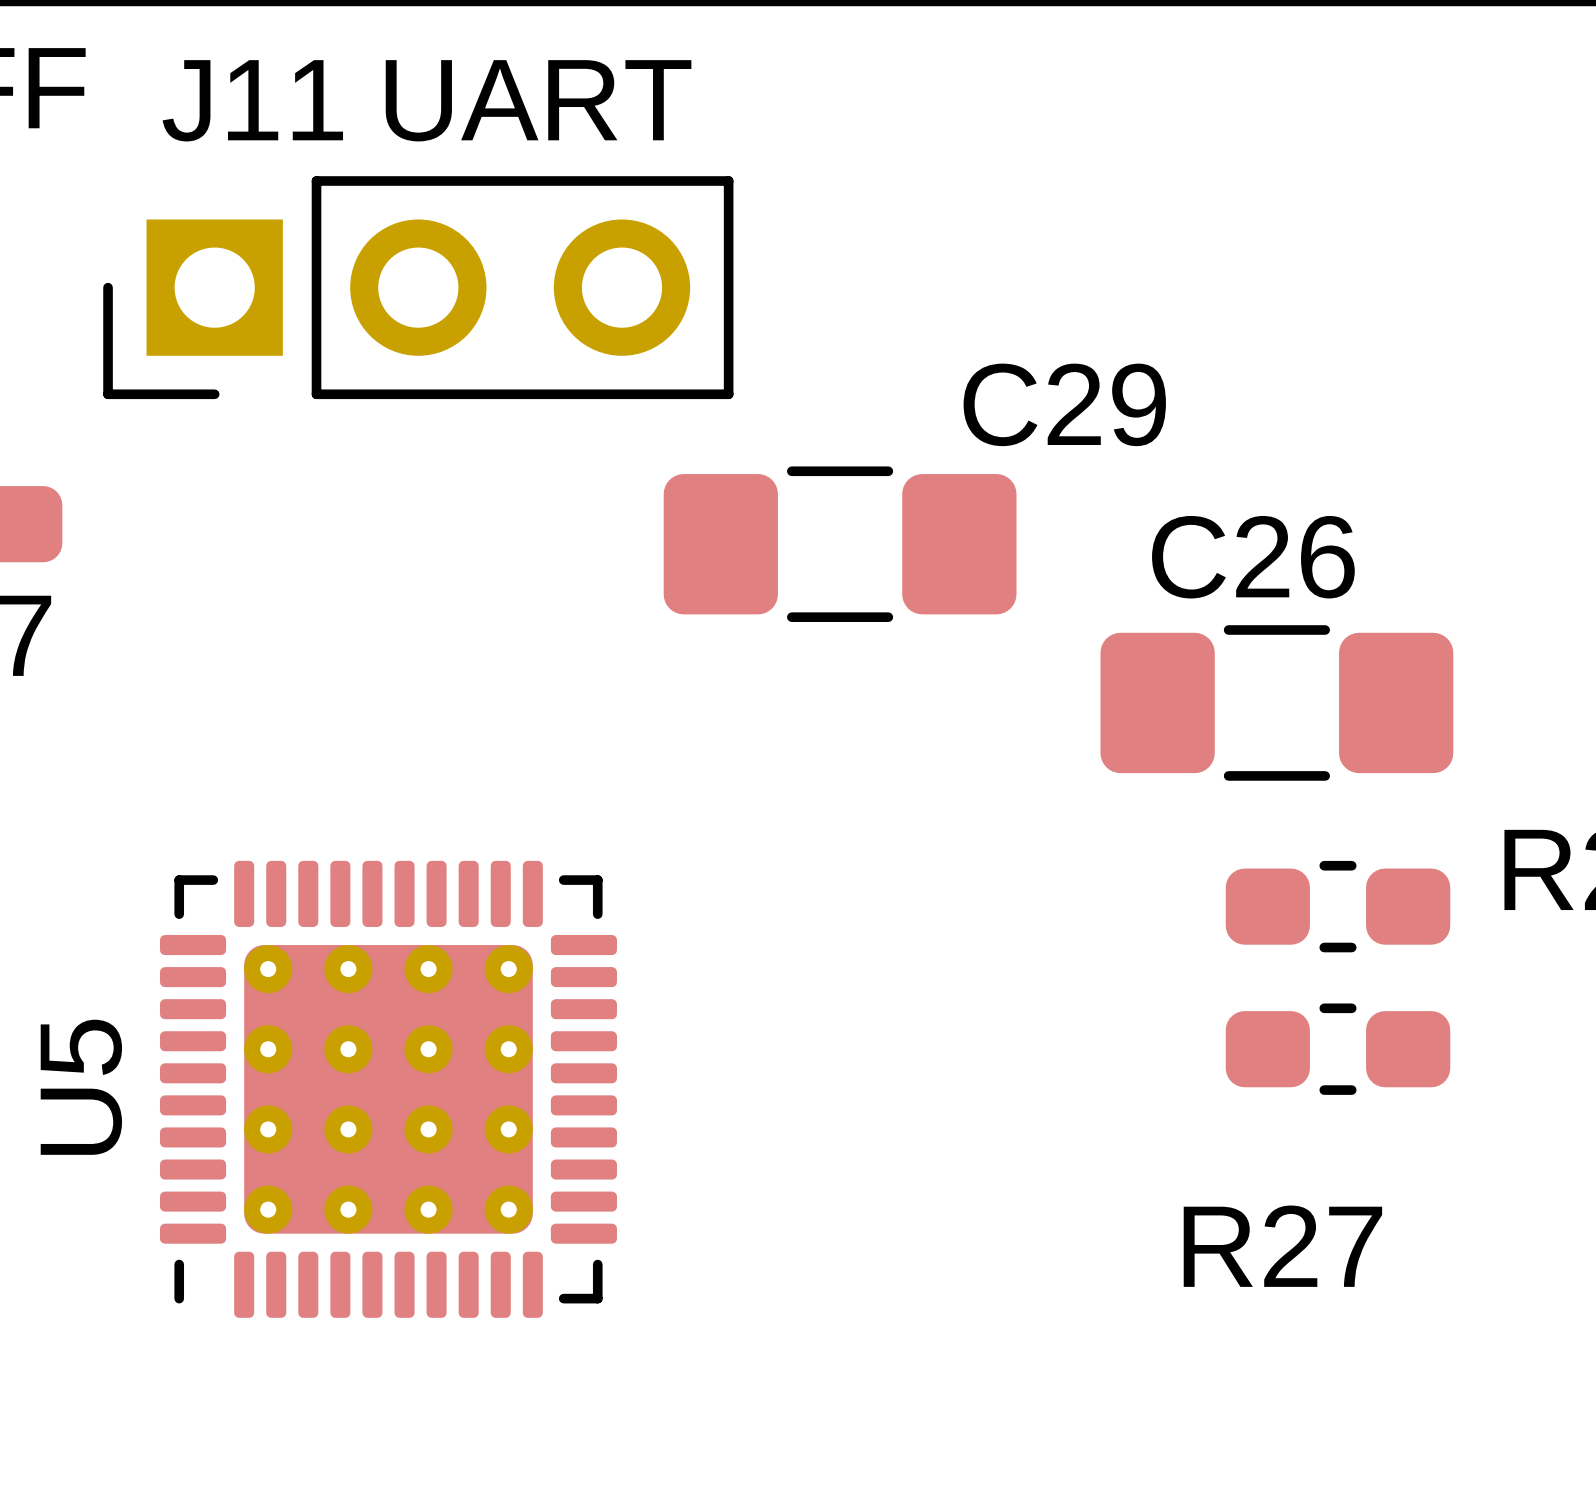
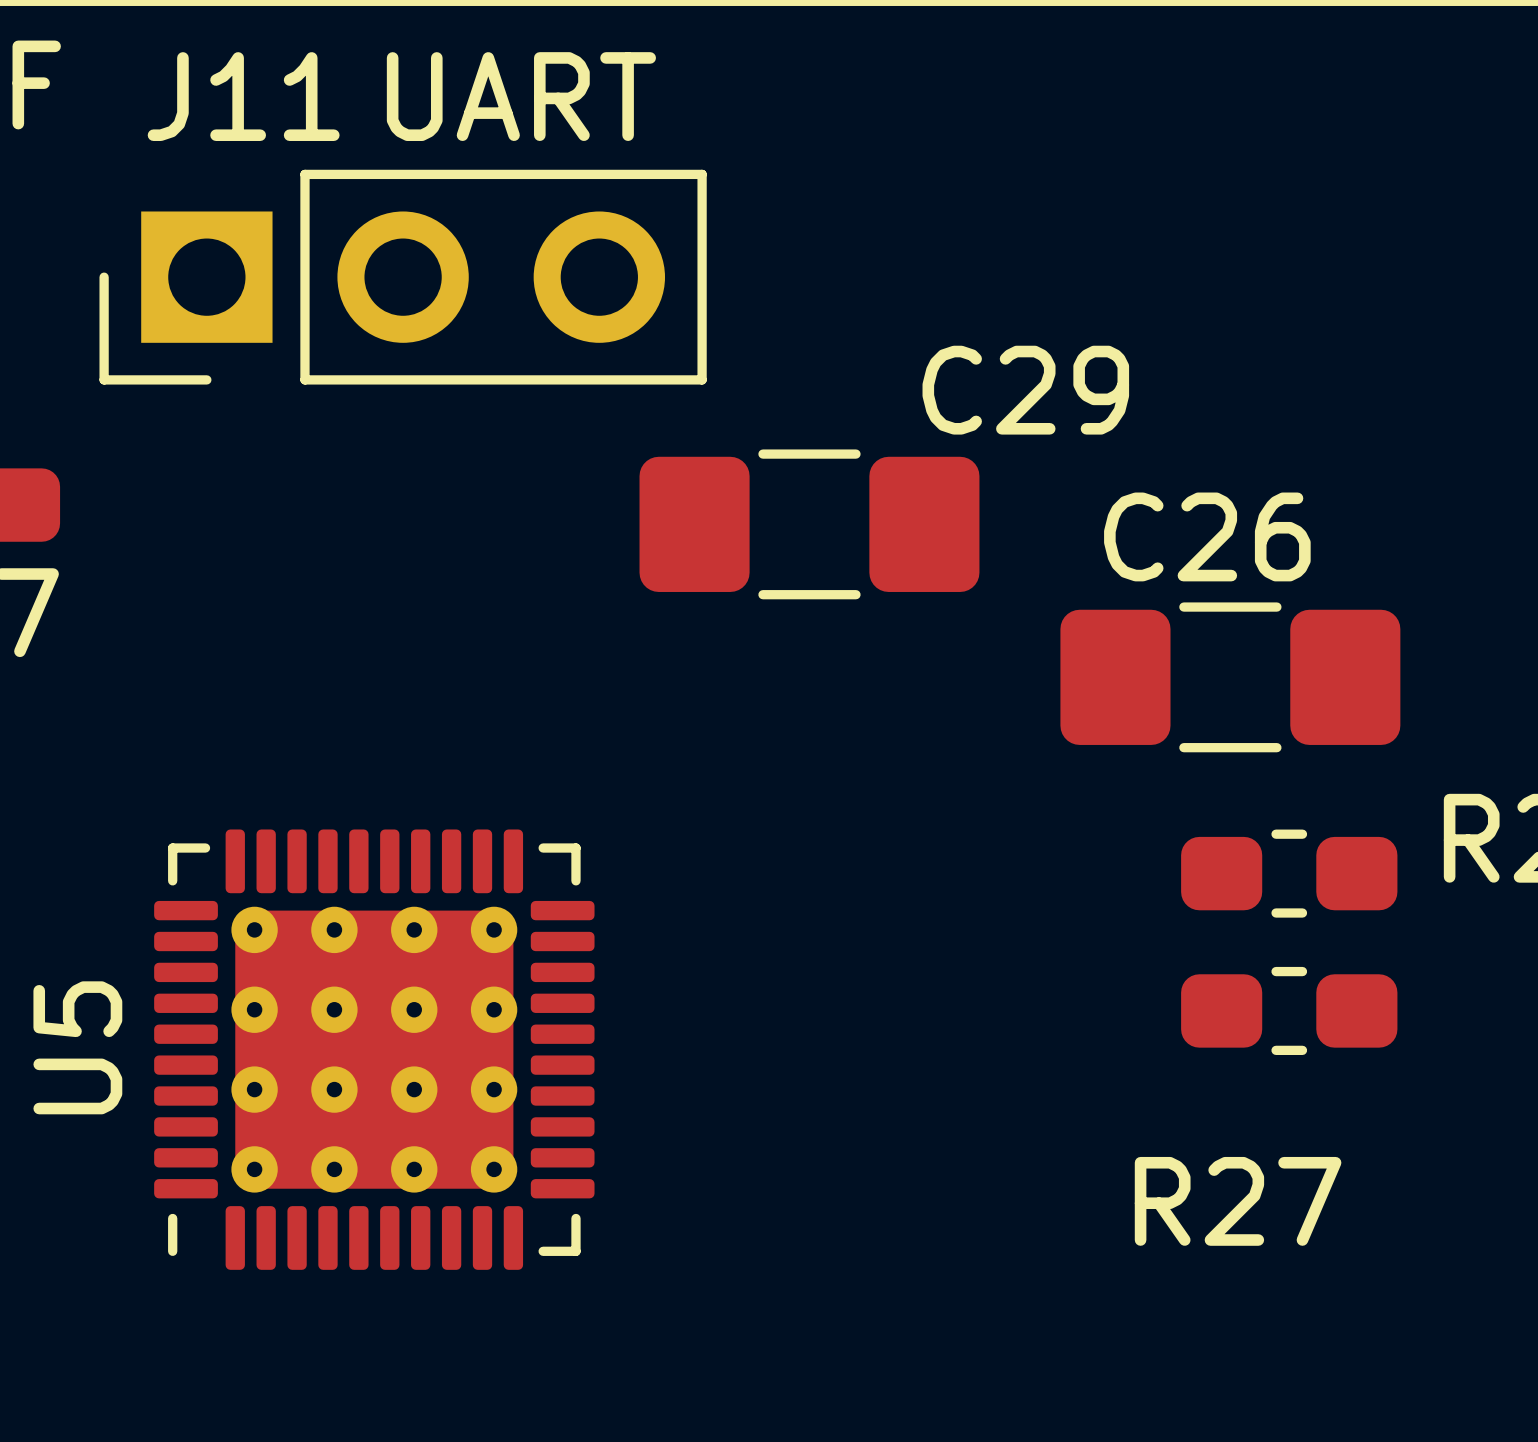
U5 footprint: [159, 860, 618, 1318] -> [154, 829, 595, 1270]

